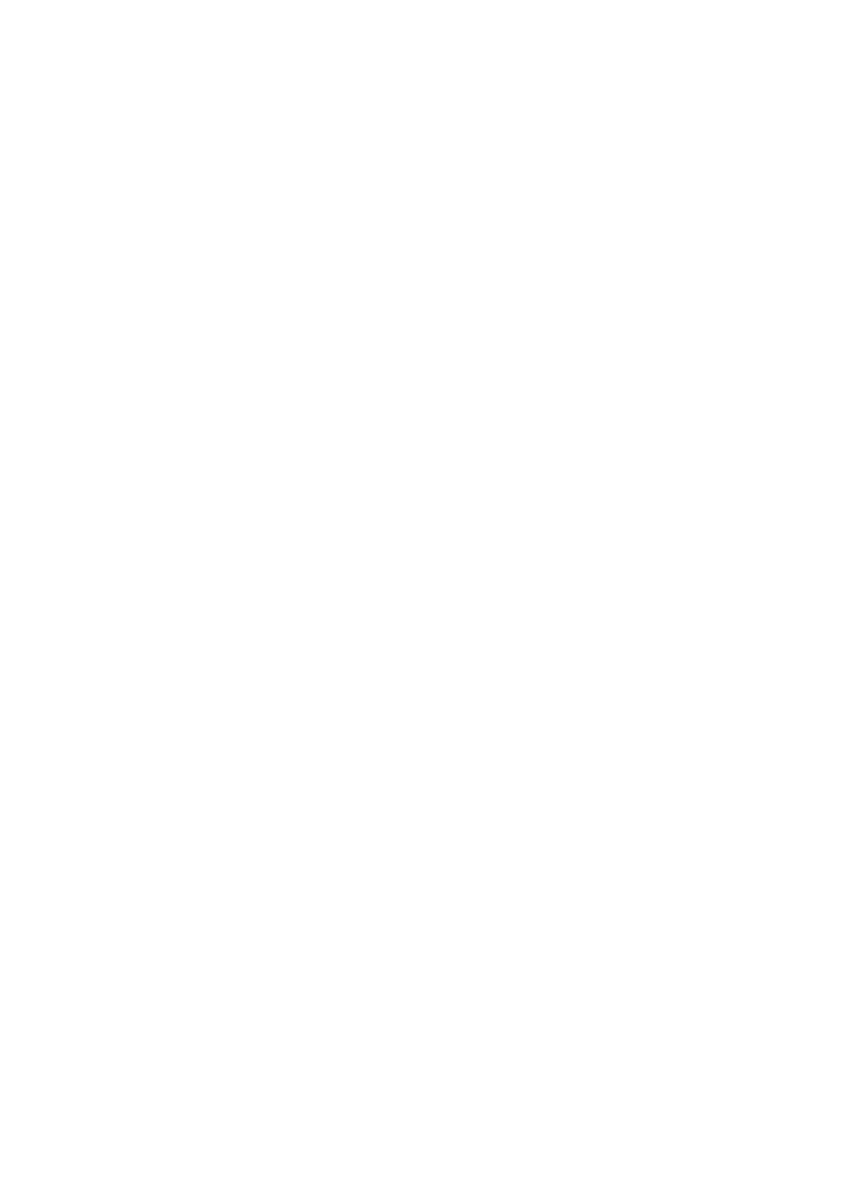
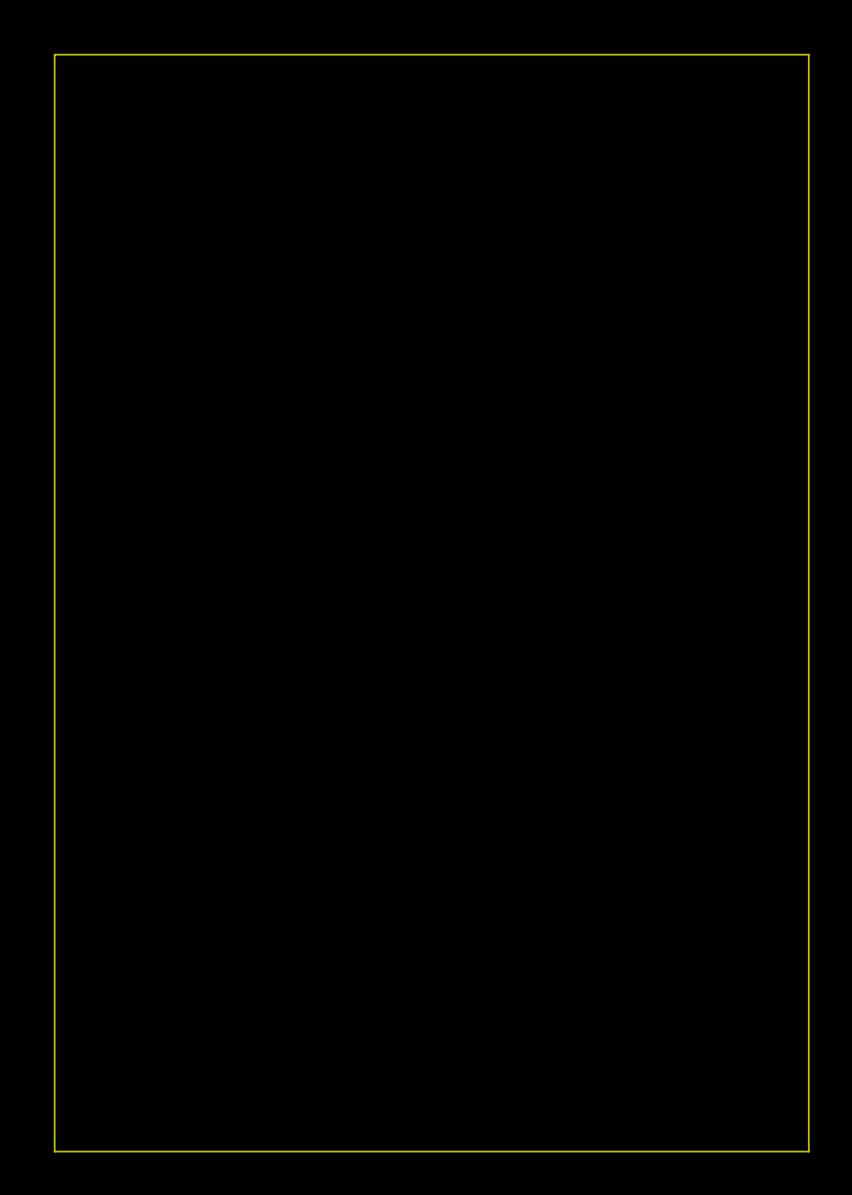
board edge: none -> (808, 54) (808, 1151) (54, 1151) (54, 54) (808, 54)

